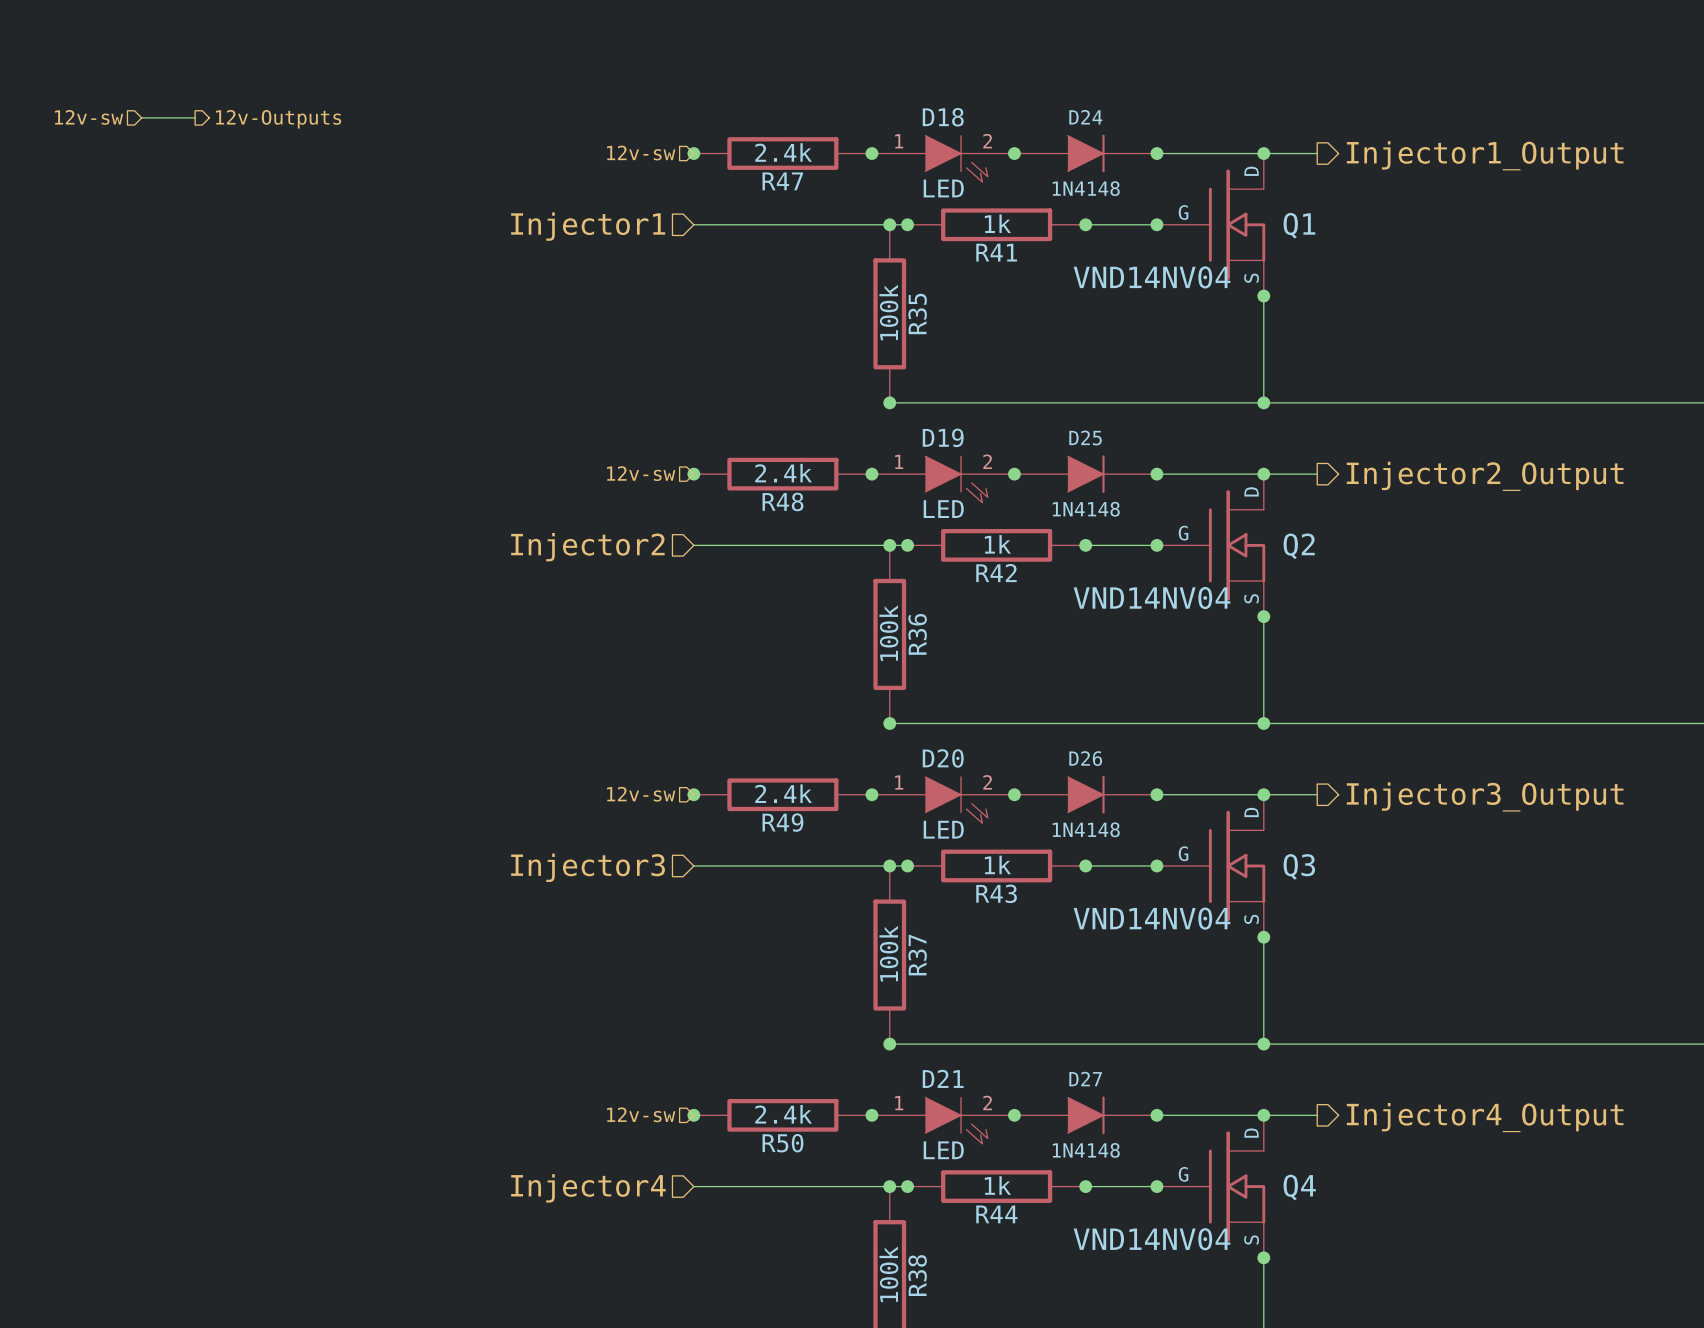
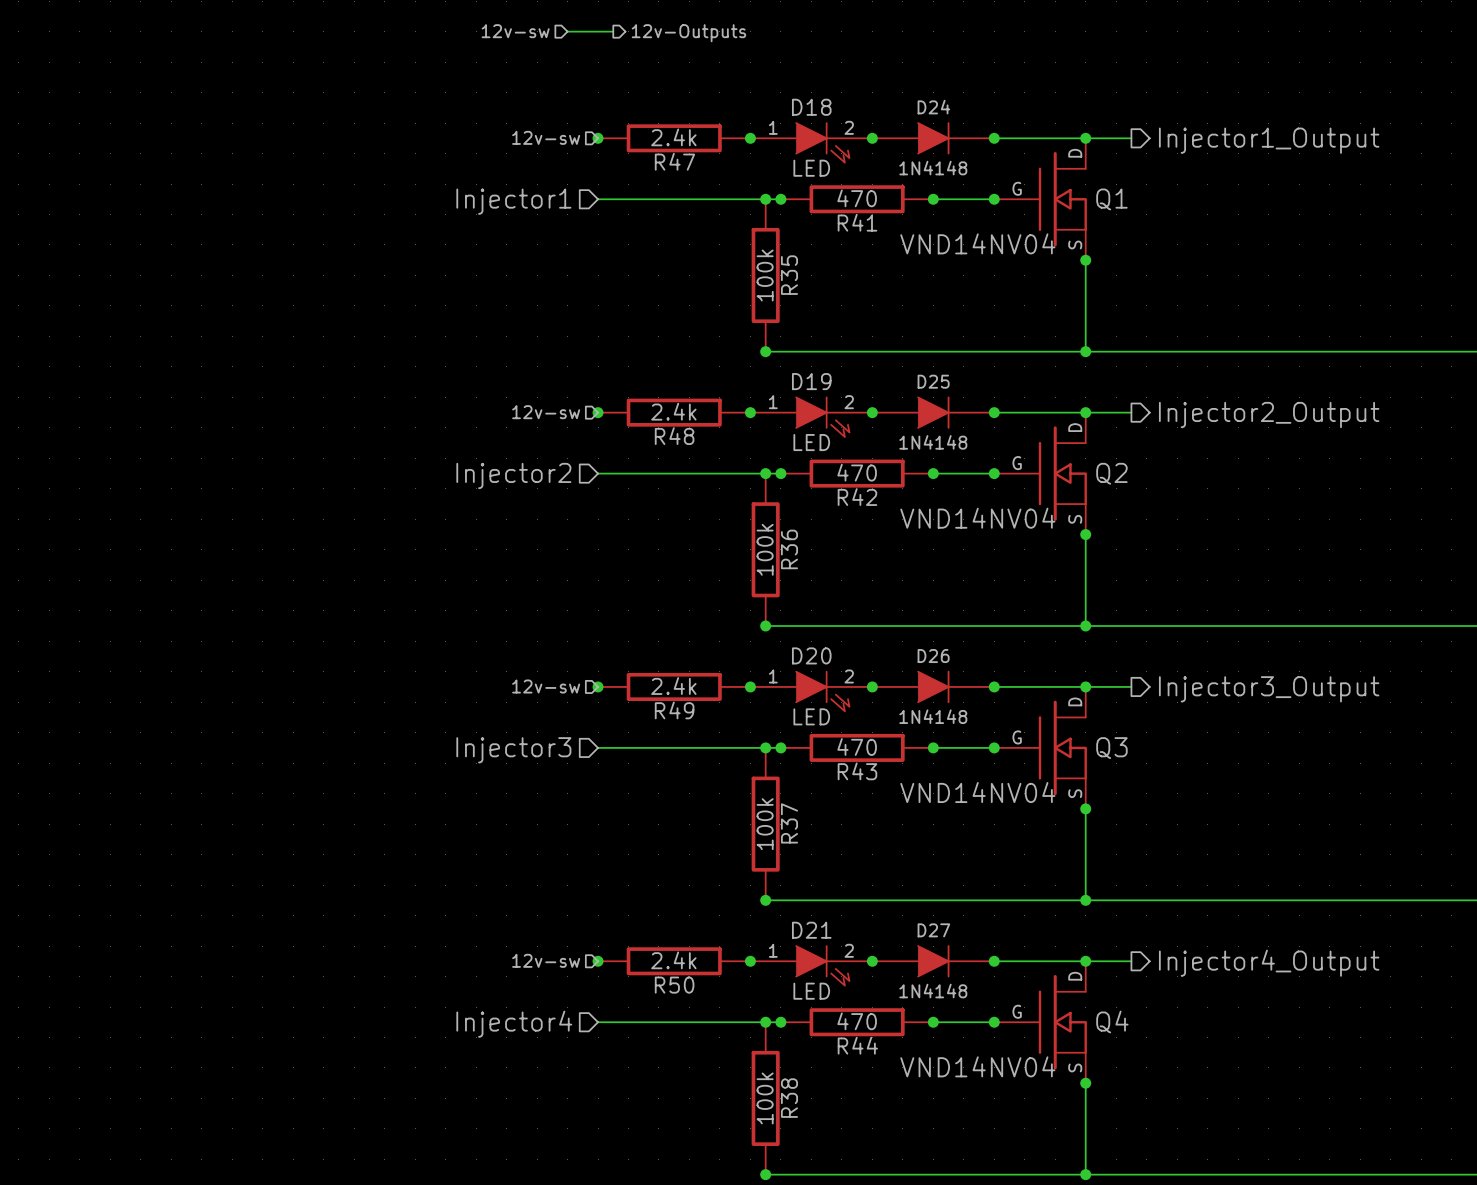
hierarchical label: none -> 12v-sw (515, 31)
wire: none -> (567, 31) (613, 31)
hierarchical label: none -> 12v-Outputs (688, 33)
hierarchical label: 12v-sw (89, 117) -> none
wire: (141, 117) (195, 117) -> none
hierarchical label: 12v-Outputs (278, 119) -> none
R41 value: 1k (997, 223) -> 470 (857, 198)
R42 value: 1k (997, 544) -> 470 (857, 472)
R43 value: 1k (997, 864) -> 470 (857, 746)
R44 value: 1k (997, 1185) -> 470 (857, 1021)

